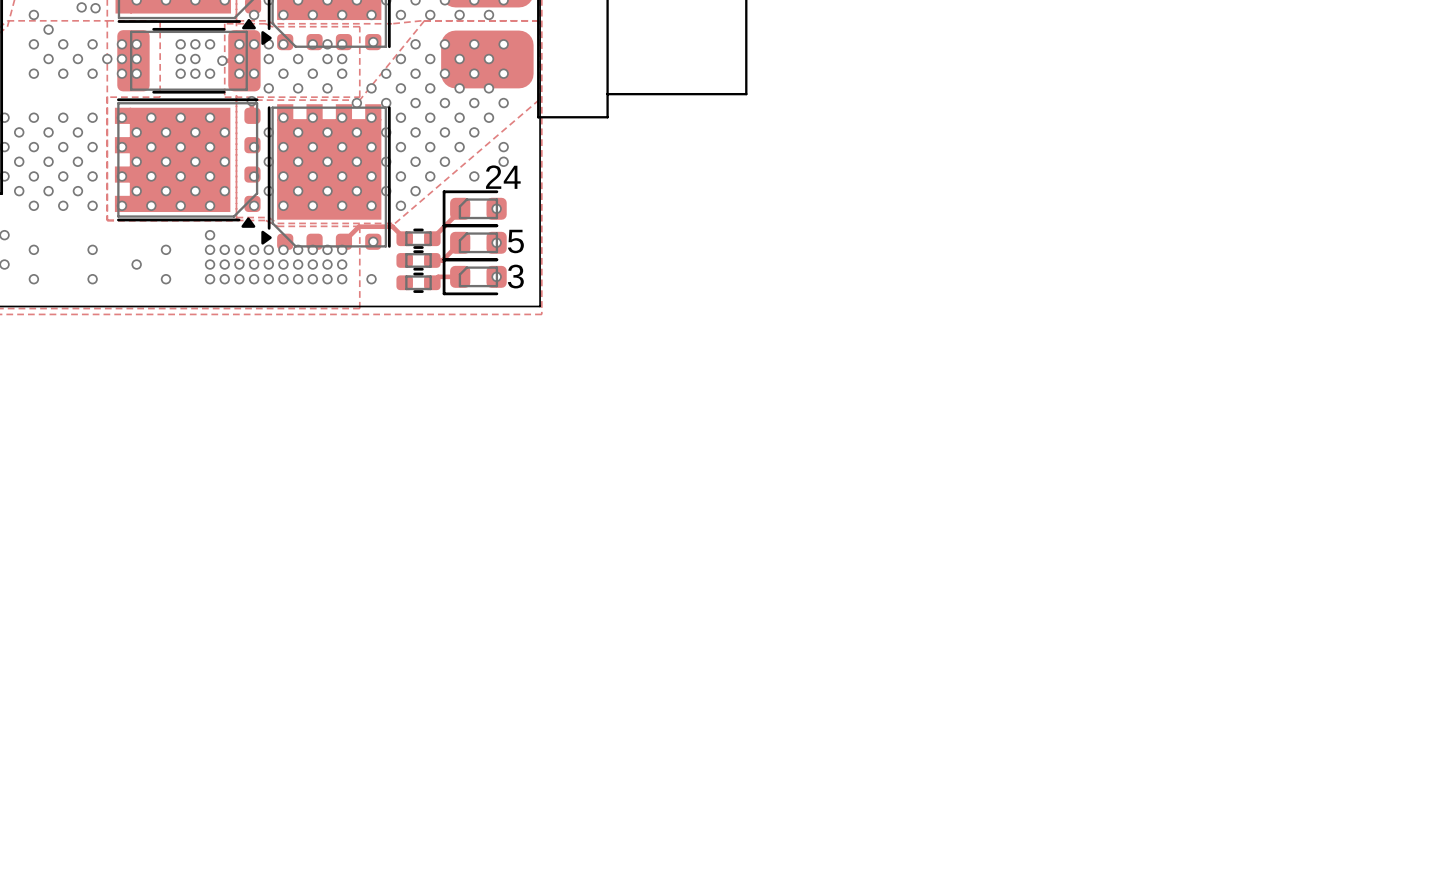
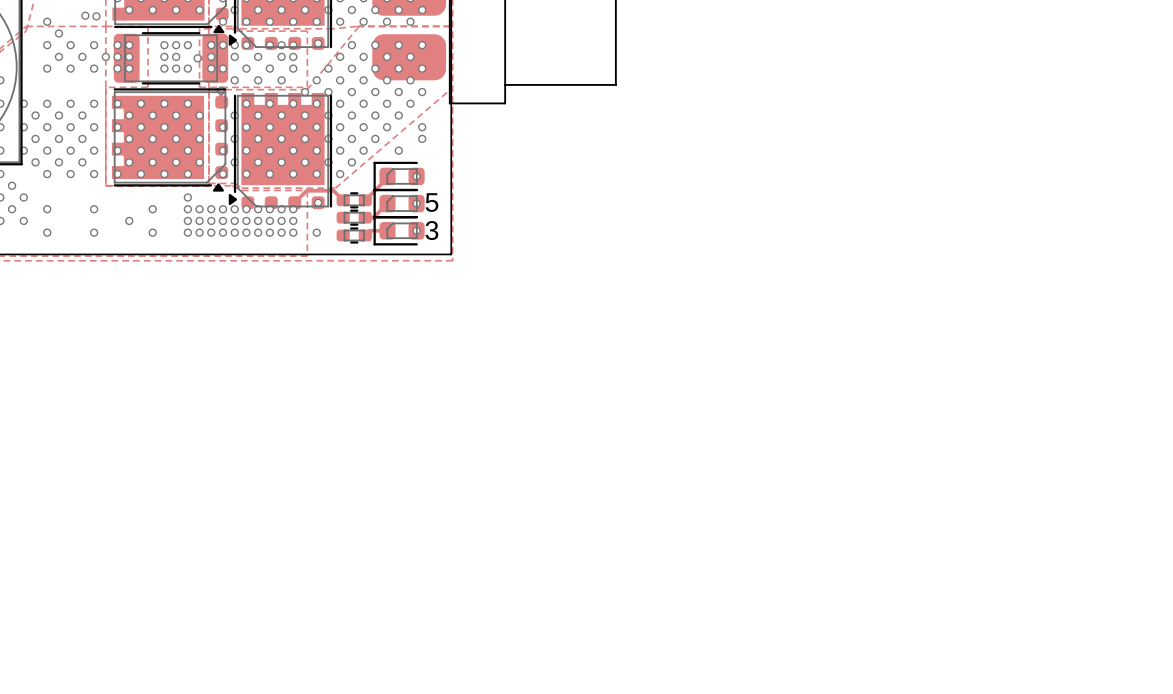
text: 24 (503, 177) -> none

